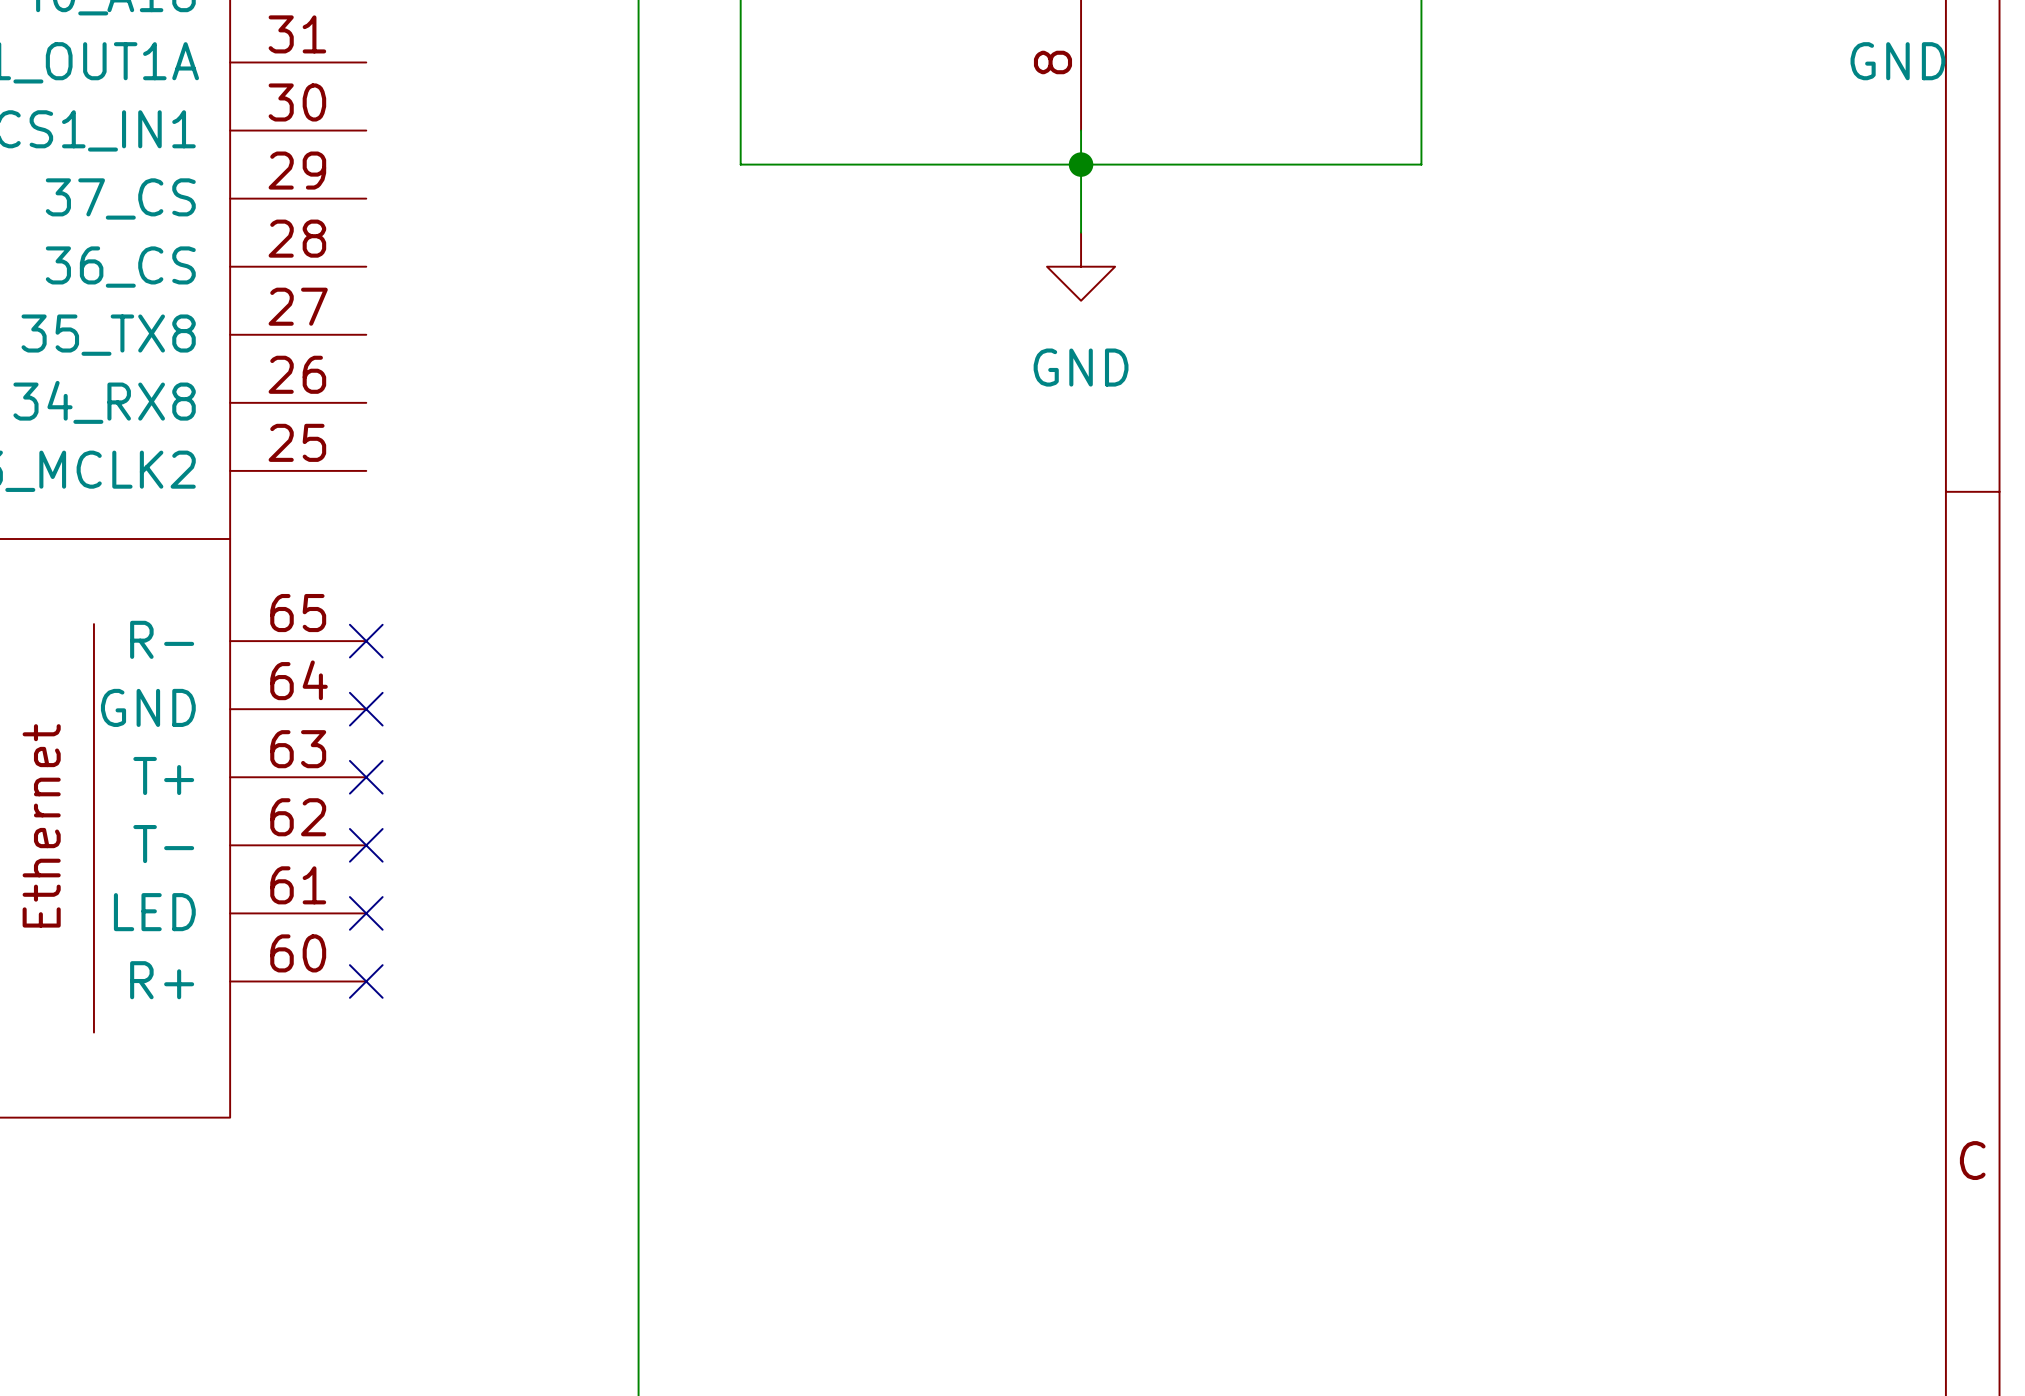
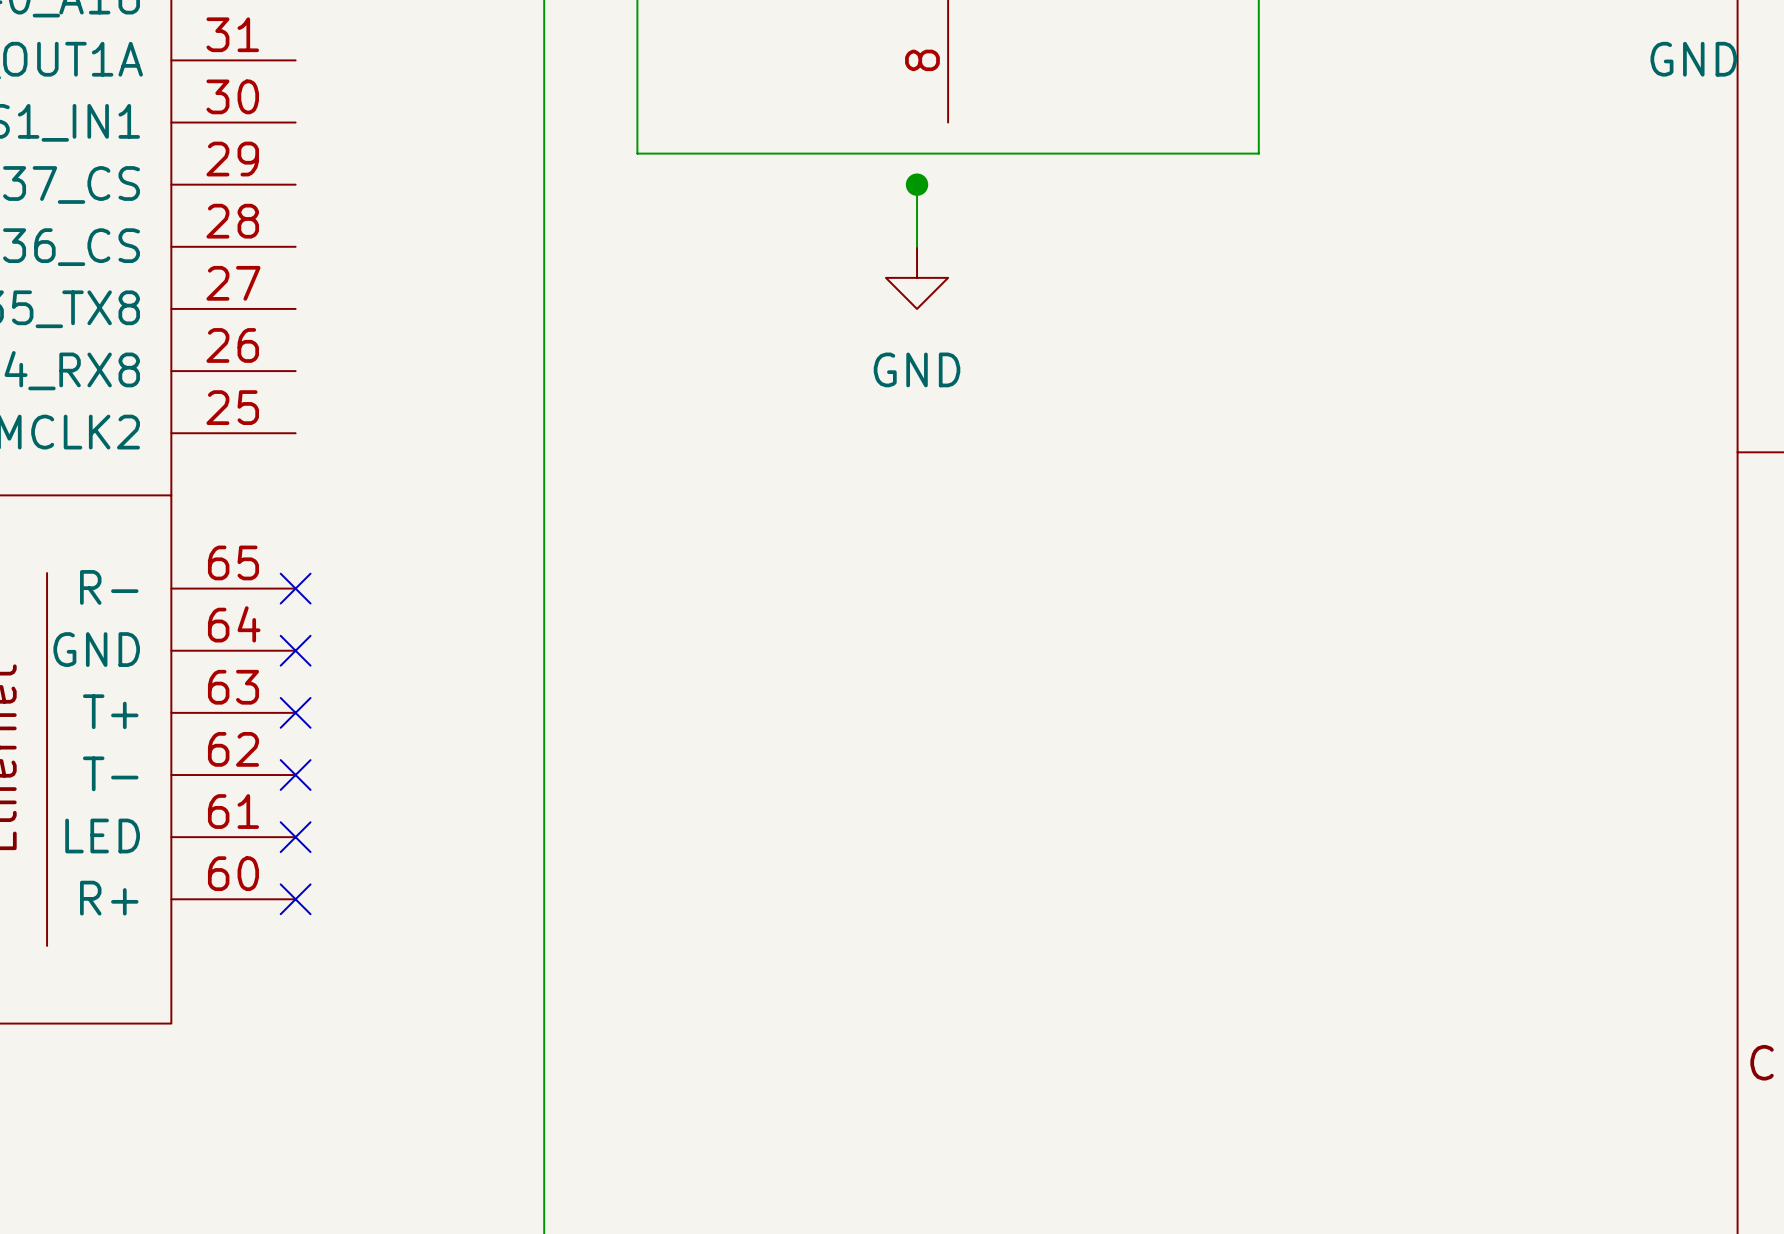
wire: (1081, 130) (1081, 232) -> none
junction position: (1081, 164) -> (917, 184)
wire: none -> (917, 184) (917, 246)
power symbol position: GND (1081, 266) -> GND (917, 277)

